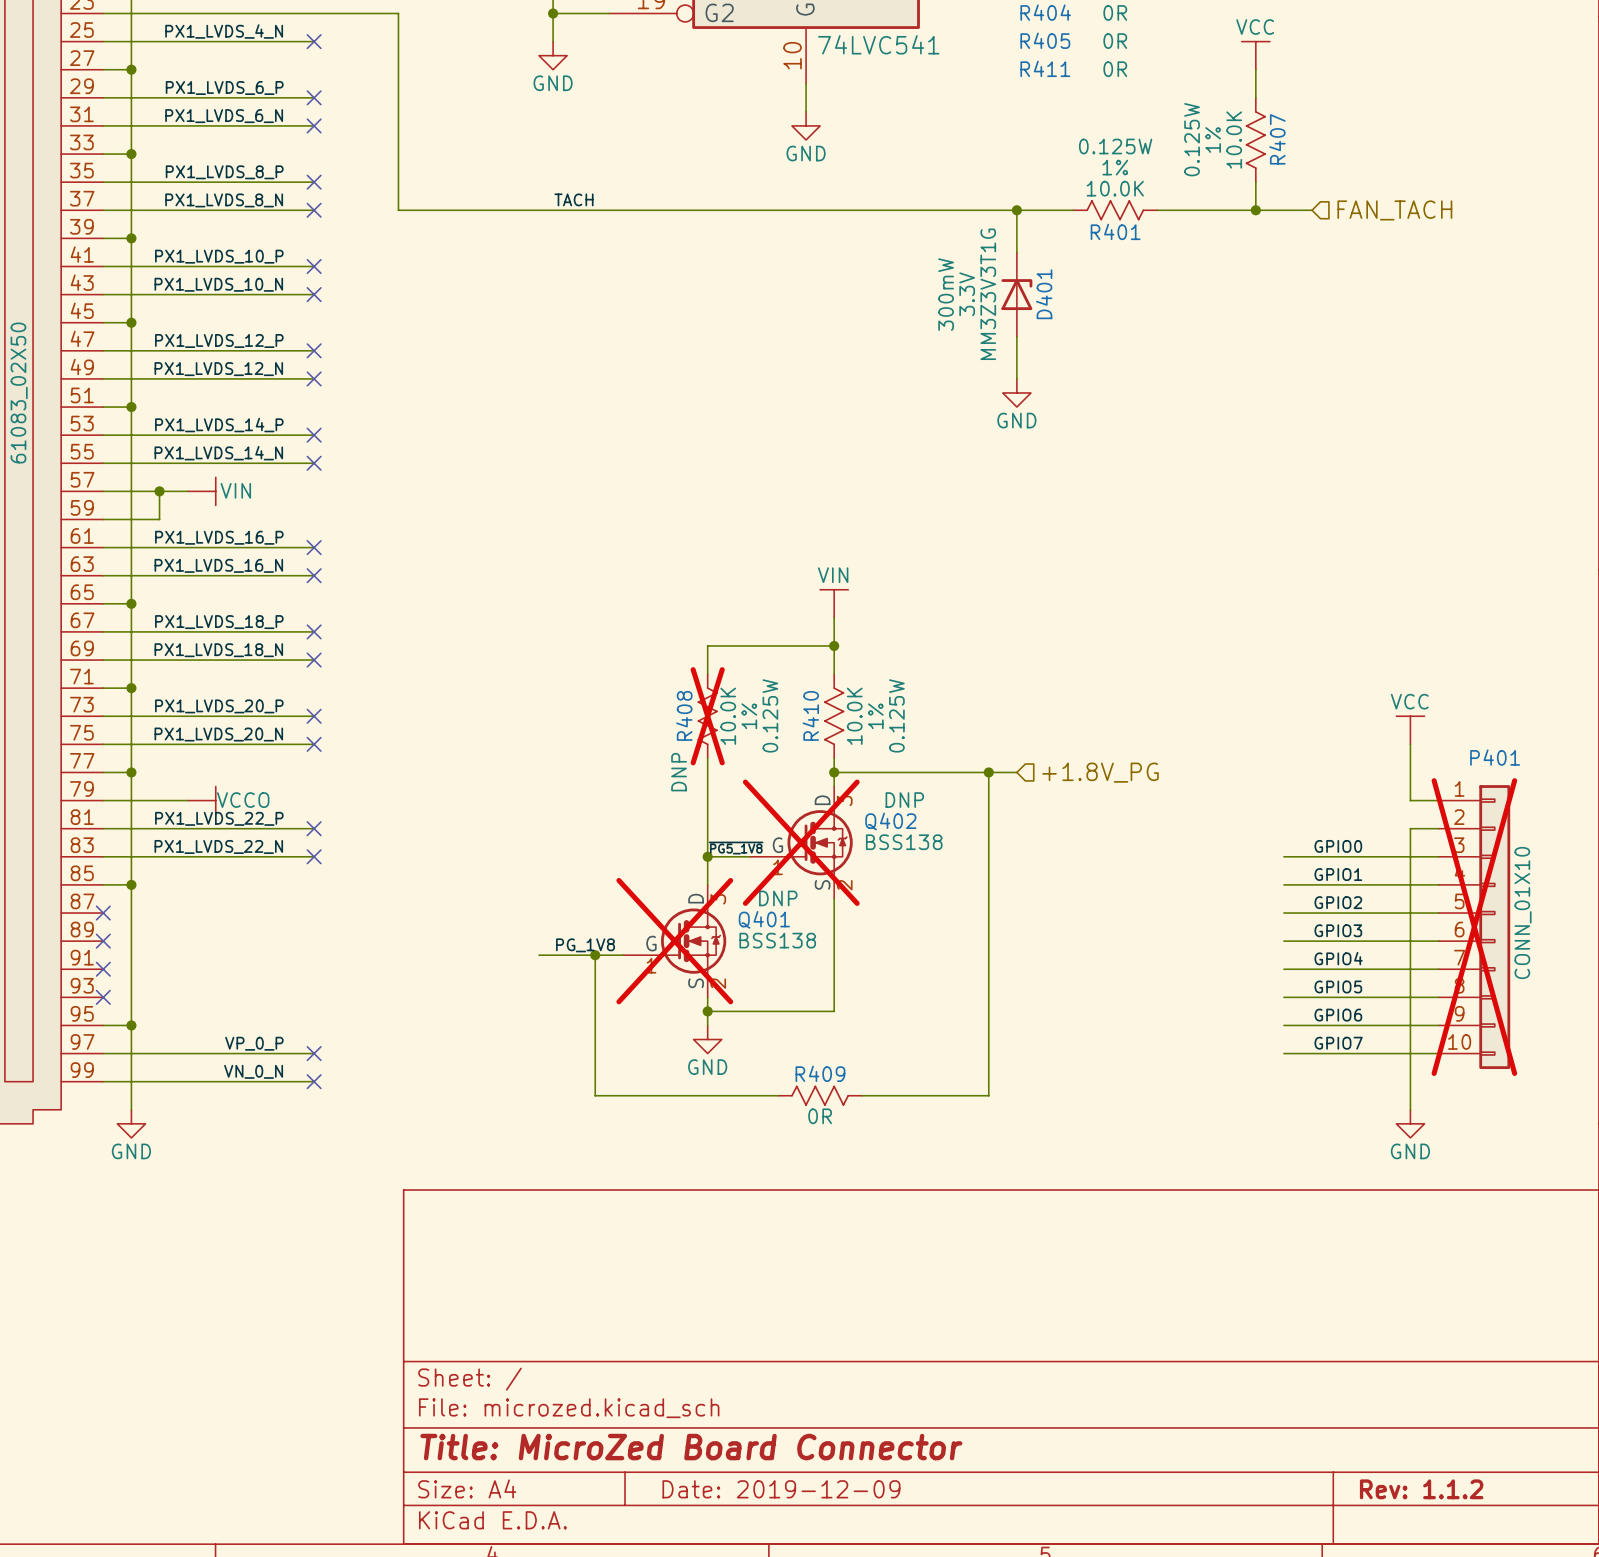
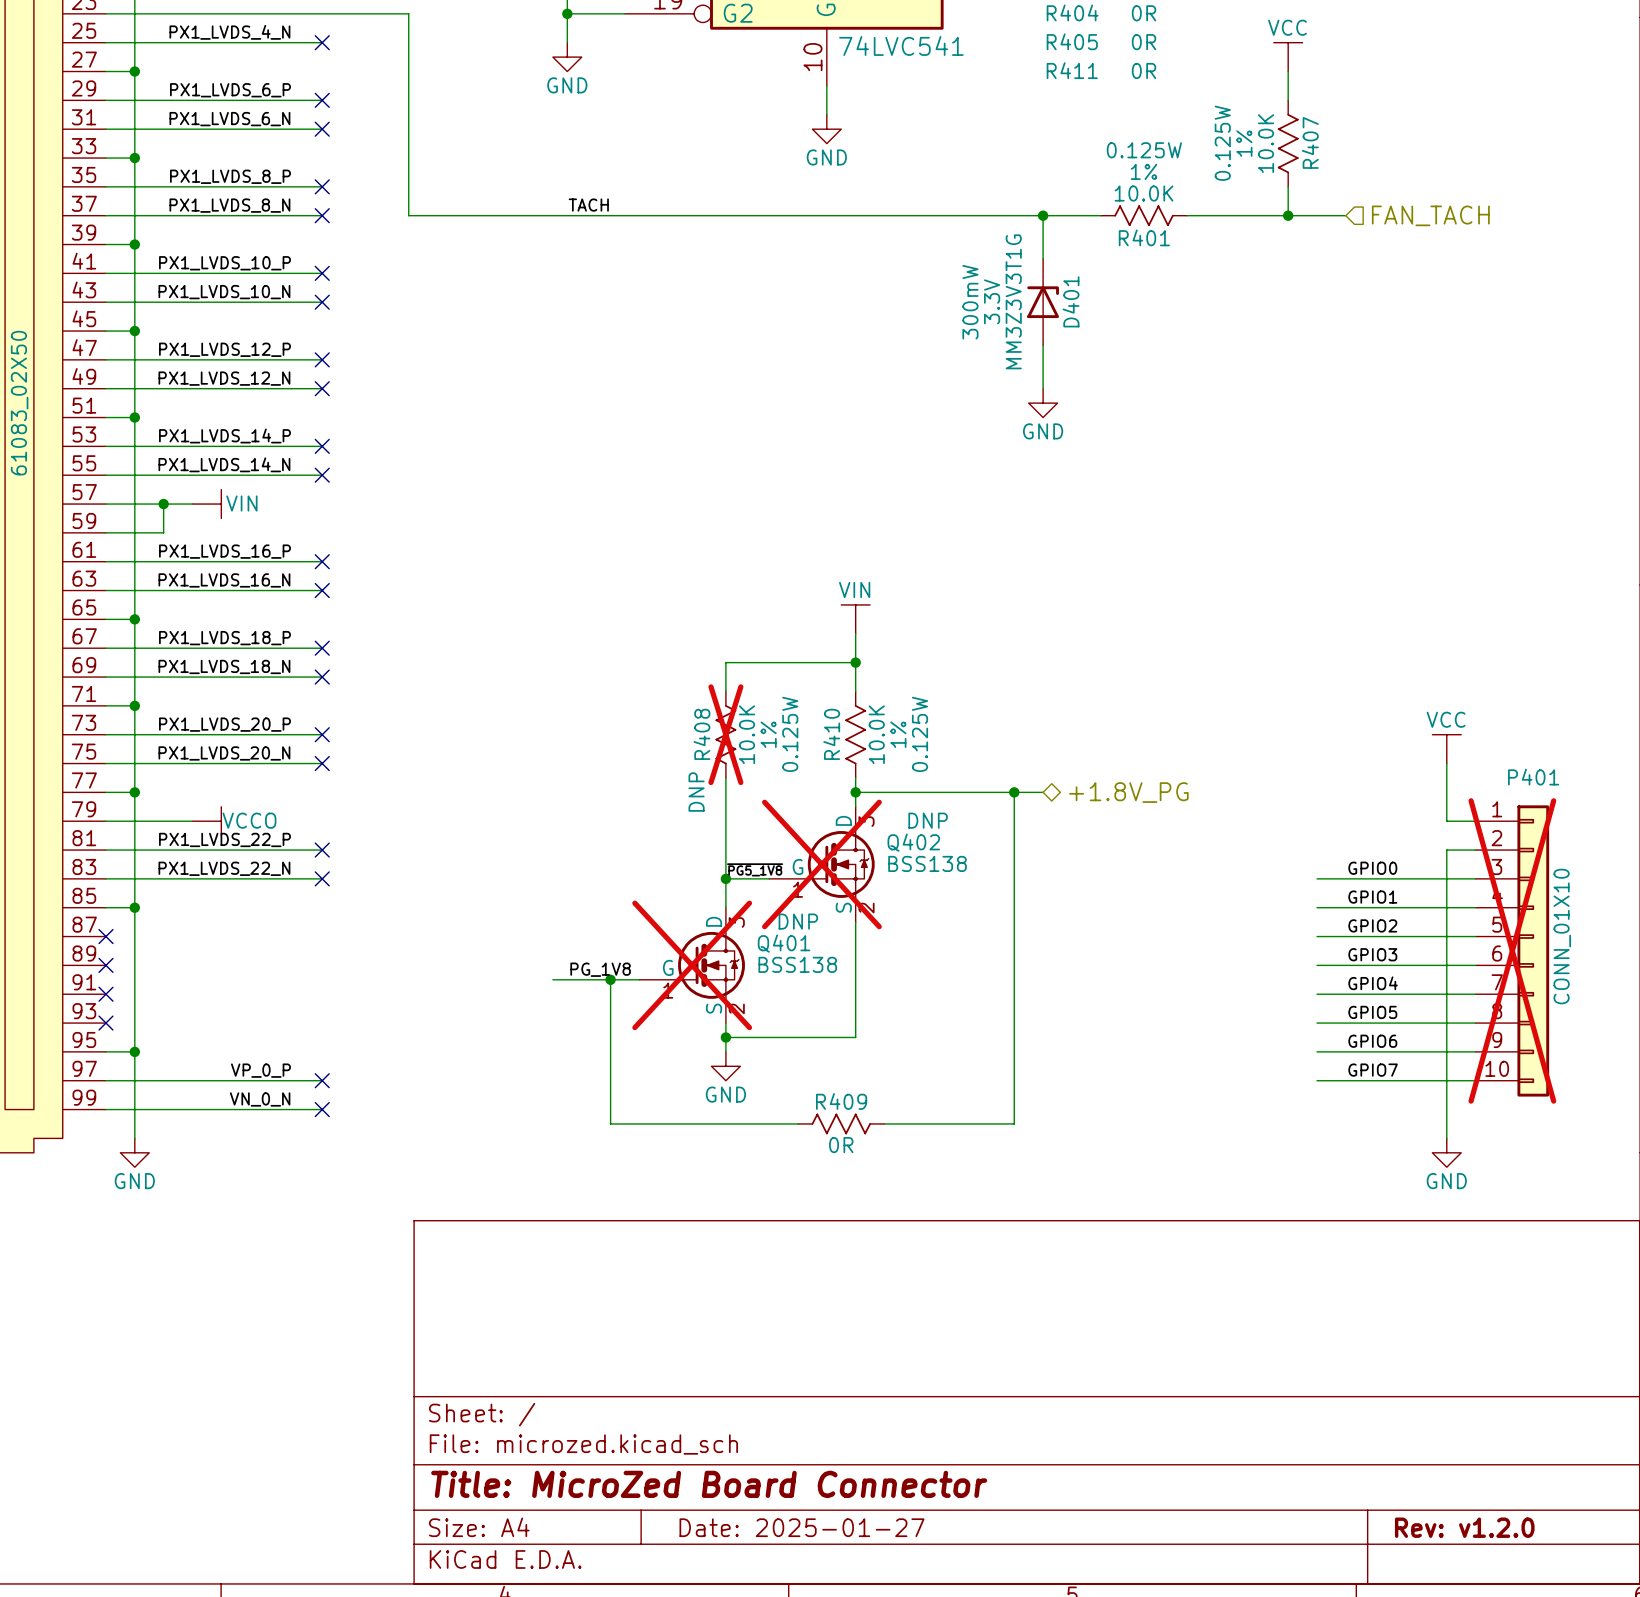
hierarchical label shape: input (1100, 772) -> bidirectional (1128, 792)
title block: Date: 2019-12-09 (781, 1489) -> Date: 2025-01-27 (802, 1527)
title block: Rev: 1.1.2 (1421, 1489) -> Rev: v1.2.0 (1464, 1527)

